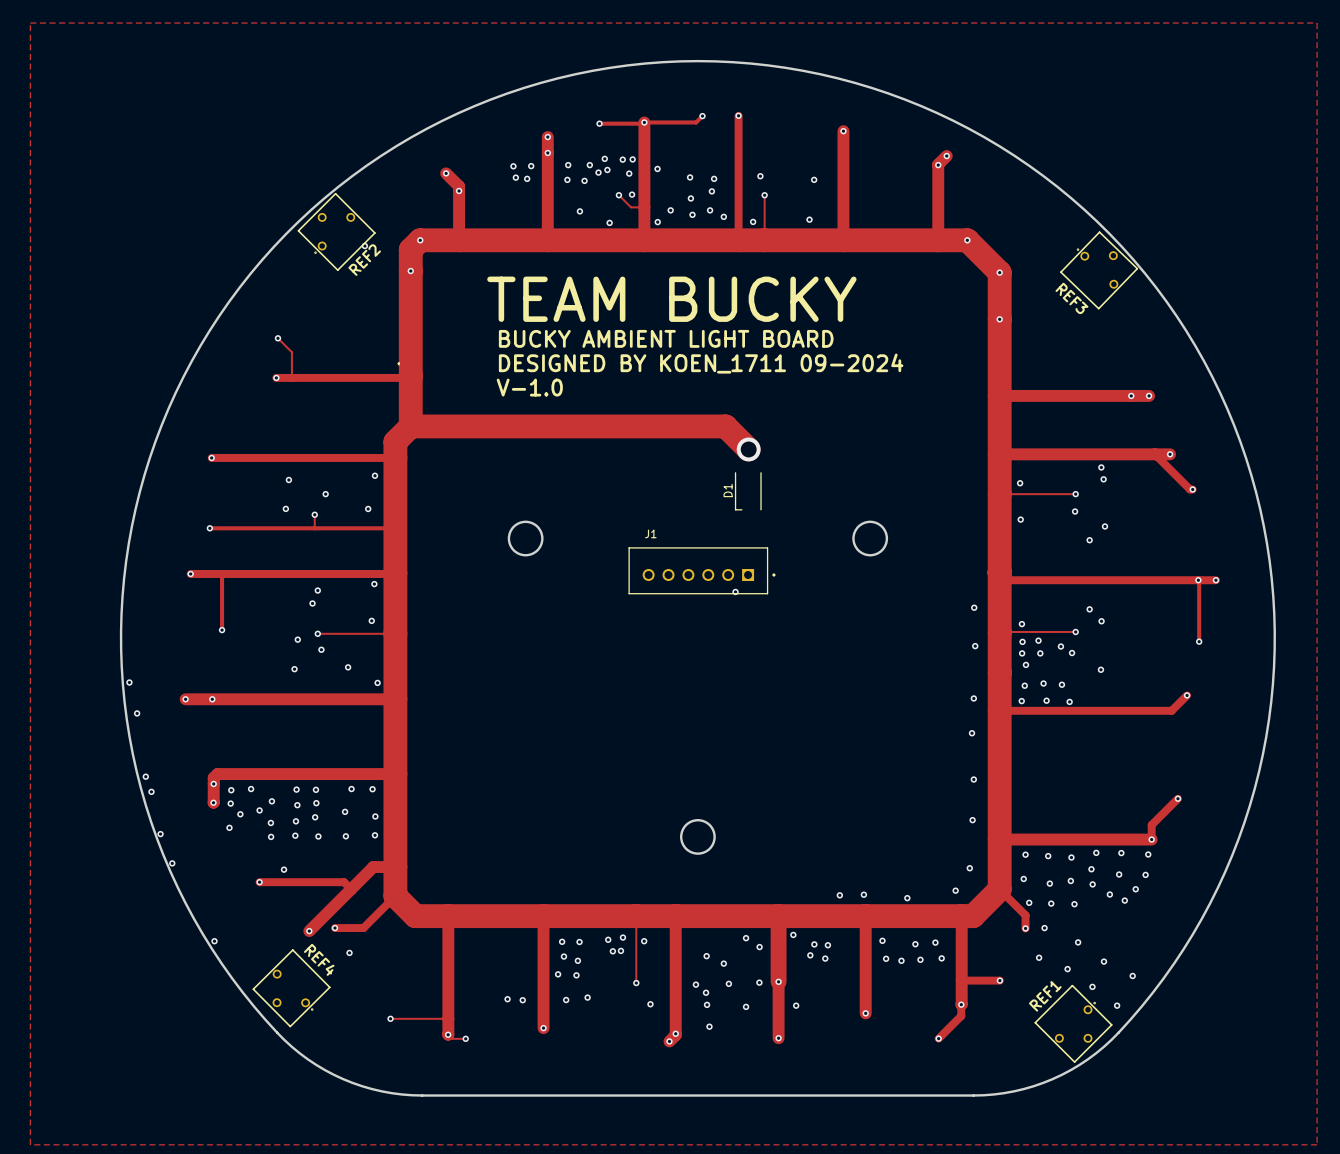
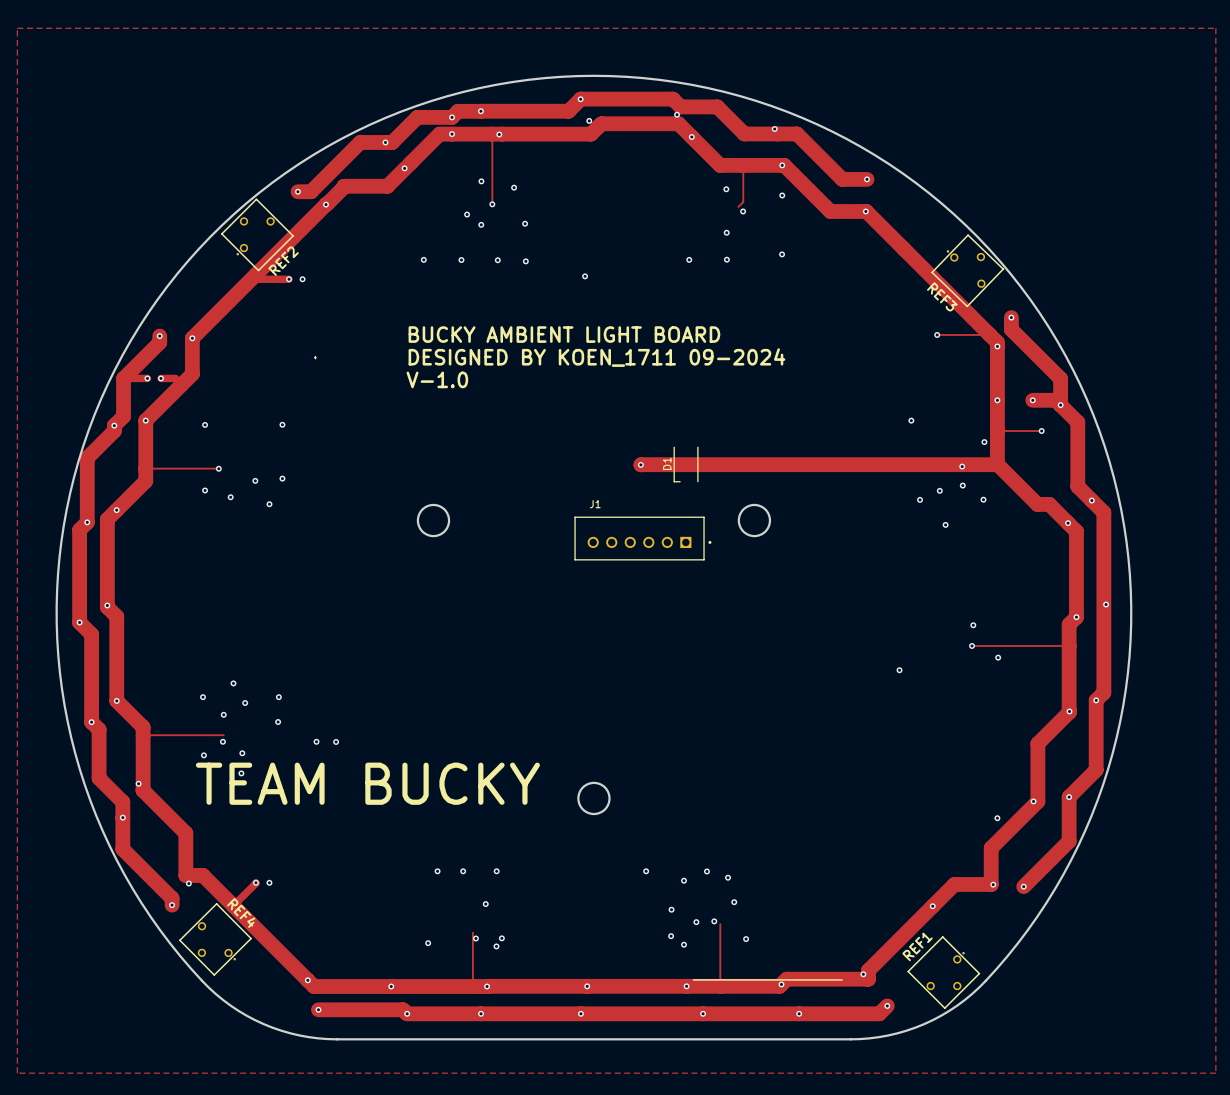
via: none -> (580, 99)
track: none -> (480, 111) (458, 111) (452, 117) (417, 117) (392, 142) (360, 142) (311, 191) (297, 191)
track: none -> (480, 111) (568, 111) (580, 99) (672, 99) (680, 106) (717, 106) (744, 133) (796, 133) (842, 179) (867, 179)
via: none -> (480, 111)
track: (738, 115) (738, 240) -> none
track: (702, 116) (696, 122) (644, 122) -> none
via: (702, 116) -> none
via: none -> (452, 117)
track: (644, 122) (644, 240) -> none
track: (644, 122) (599, 123) -> none
via: (599, 123) -> none
track: (843, 131) (843, 240) -> none
via: none -> (452, 134)
track: none -> (491, 134) (492, 204)
track: (547, 137) (547, 240) -> none
via: none -> (691, 137)
via: none -> (385, 142)
via: (547, 152) -> none
track: (946, 156) (938, 164) (938, 240) -> none
via: (946, 156) -> none
via: (604, 158) -> none
via: (622, 159) -> none
via: (632, 159) -> none
via: (568, 165) -> none
via: (589, 165) -> none
via: (938, 165) -> none
via: (513, 166) -> none
via: (531, 166) -> none
via: (657, 168) -> none
via: (607, 169) -> none
track: none -> (743, 165) (743, 202) (738, 206)
via: none -> (782, 165)
via: (598, 172) -> none
track: (446, 173) (459, 186) (459, 240) -> none
via: (629, 173) -> none
via: (760, 176) -> none
via: (515, 177) -> none
via: (690, 177) -> none
via: (527, 178) -> none
via: (714, 178) -> none
via: (567, 179) -> none
via: (814, 179) -> none
via: (584, 180) -> none
via: none -> (867, 179)
via: none -> (481, 181)
via: (459, 190) -> none
via: (711, 191) -> none
via: none -> (514, 187)
via: (632, 194) -> none
track: (618, 195) (631, 207) (644, 207) -> none
via: (618, 195) -> none
track: (764, 195) (764, 240) -> none
via: (764, 195) -> none
via: none -> (726, 189)
via: none -> (297, 191)
via: (690, 198) -> none
via: none -> (782, 195)
via: (670, 210) -> none
via: (710, 210) -> none
via: (579, 211) -> none
via: none -> (326, 204)
via: none -> (492, 204)
via: (692, 214) -> none
via: (723, 216) -> none
via: none -> (865, 211)
via: (753, 221) -> none
via: none -> (467, 214)
via: (609, 222) -> none
via: (657, 222) -> none
REF2 position: (336, 231) -> (257, 234)
via: none -> (525, 223)
via: none -> (481, 224)
via: (420, 240) -> none
via: (967, 240) -> none
via: none -> (726, 232)
via: (364, 246) -> none
via: none -> (782, 254)
REF3 position: (1099, 270) -> (967, 270)
via: (410, 271) -> none
via: none -> (423, 259)
via: none -> (461, 260)
via: none -> (689, 259)
via: none -> (726, 259)
via: none -> (497, 260)
via: (999, 272) -> none
via: none -> (525, 261)
track: none -> (255, 274) (260, 279) (289, 279)
via: none -> (585, 276)
via: none -> (289, 279)
via: none -> (302, 279)
text: TEAM BUCKY (671, 299) -> none
via position: (999, 319) -> (937, 334)
track: none -> (1011, 317) (1011, 329) (1060, 378) (1060, 405)
via: none -> (1011, 317)
track: (277, 337) (291, 352) (291, 377) -> none
via: (277, 338) -> none
text position: BUCKY AMBIENT LIGHT BOARD (666, 338) -> BUCKY AMBIENT LIGHT BOARD (564, 334)
track: none -> (989, 334) (937, 334)
track: none -> (159, 336) (159, 342) (123, 378)
via: none -> (159, 336)
via: none -> (192, 338)
line: (399, 363) (399, 364) -> none
line: (399, 363) (398, 363) -> none
text position: DESIGNED BY KOEN_1711 09-2024 (701, 363) -> DESIGNED BY KOEN_1711 09-2024 (596, 357)
via: none -> (997, 346)
track: (410, 375) (408, 377) (276, 377) -> none
line: none -> (314, 357) (315, 358)
via: (276, 377) -> none
text position: V-1.0 (529, 387) -> V-1.0 (437, 379)
track: (999, 395) (1149, 395) -> none
via: (1131, 395) -> none
via: (1149, 395) -> none
track: none -> (147, 378) (123, 378)
via: none -> (147, 378)
track: none -> (161, 378) (175, 378) (181, 384)
via: none -> (161, 378)
track: none -> (123, 378) (123, 416) (114, 425) (114, 431) (87, 458) (87, 522) (79, 530) (79, 622) (91, 634) (91, 722) (99, 729) (99, 778) (122, 802) (122, 849) (172, 898) (172, 905)
via: none -> (997, 400)
track: none -> (1032, 400) (1055, 400) (1077, 422) (1077, 486) (1103, 512) (1103, 692) (1096, 700) (1096, 770) (1069, 797) (1069, 841) (1023, 886)
via: none -> (1032, 400)
track: (410, 426) (395, 441) (395, 896) -> none
track: (410, 426) (725, 426) (748, 449) -> none
track: (410, 426) (410, 249) (420, 240) (967, 240) (999, 272) (999, 572) -> none
via: none -> (1060, 405)
via: none -> (145, 420)
via: none -> (911, 420)
via: none -> (282, 424)
via: none -> (114, 425)
via: (748, 449) -> none
track: (999, 454) (1170, 454) -> none
track: (1154, 454) (1190, 489) (1192, 489) -> none
via: (1170, 454) -> none
track: none -> (1041, 431) (997, 431) (997, 464) (640, 464)
via: none -> (1041, 431)
via position: (211, 457) -> (205, 424)
track: (395, 457) (211, 457) -> none
via: none -> (984, 442)
via: (1101, 467) -> none
via: (374, 475) -> none
via: (1103, 479) -> none
via: (288, 480) -> none
via: (1020, 483) -> none
via: (1192, 489) -> none
via: none -> (640, 464)
via: none -> (962, 466)
via: (325, 494) -> none
via: (1075, 494) -> none
track: none -> (145, 468) (218, 468)
via: none -> (218, 468)
via: none -> (282, 478)
via: (368, 508) -> none
via: (1075, 511) -> none
via: none -> (962, 485)
track: (314, 514) (314, 528) -> none
via: (314, 514) -> none
via: none -> (230, 497)
via: (1105, 526) -> none
track: (209, 528) (395, 528) -> none
via position: (209, 528) -> (205, 490)
via: none -> (920, 499)
via: none -> (983, 499)
via: none -> (1091, 500)
via: none -> (269, 504)
round board edge position: (525, 538) -> (433, 520)
round board edge position: (870, 538) -> (754, 520)
via: none -> (116, 510)
via: (1089, 540) -> none
via: none -> (87, 522)
via: none -> (1068, 523)
via: none -> (945, 524)
track: (999, 572) (999, 889) -> none
track: (999, 572) (1007, 580) (1215, 580) -> none
via: (190, 573) -> none
track: (222, 573) (222, 629) -> none
track: (395, 573) (190, 573) -> none
via: (1198, 580) -> none
via: (1215, 580) -> none
via: (374, 584) -> none
via: (317, 590) -> none
via: (735, 591) -> none
via: (312, 603) -> none
via: (974, 607) -> none
via: (1089, 609) -> none
via: (371, 620) -> none
via: (1101, 621) -> none
via: (1021, 624) -> none
via: (222, 630) -> none
track: (1075, 631) (999, 632) -> none
via: (1075, 631) -> none
via: (317, 633) -> none
track: (395, 633) (317, 633) -> none
via: (297, 639) -> none
via: (1038, 640) -> none
via: (1022, 641) -> none
via: none -> (107, 605)
via: (975, 646) -> none
via: (1060, 646) -> none
via: (321, 649) -> none
via: (1022, 653) -> none
via: (1040, 653) -> none
via: (1072, 653) -> none
via: none -> (1076, 617)
via: none -> (79, 622)
via: none -> (973, 625)
via: (1025, 664) -> none
via: (348, 667) -> none
via: (294, 669) -> none
via: (1100, 669) -> none
via: (129, 682) -> none
via: (377, 682) -> none
via: (1043, 683) -> none
via: (1061, 684) -> none
via: (1024, 685) -> none
track: none -> (972, 645) (1069, 646)
via: none -> (972, 645)
track: (1187, 695) (1171, 710) (999, 710) -> none
via: (1187, 695) -> none
via: (973, 698) -> none
via: none -> (998, 657)
track: (185, 699) (395, 699) -> none
via: (185, 699) -> none
via: (212, 699) -> none
via: (1046, 700) -> none
via: (1021, 701) -> none
via: (1069, 701) -> none
via: none -> (899, 670)
via: (137, 713) -> none
via: none -> (233, 683)
via: (972, 733) -> none
via: none -> (202, 697)
via: none -> (278, 697)
via: none -> (1096, 700)
via: none -> (116, 700)
via: none -> (245, 703)
via: none -> (1069, 711)
via: none -> (223, 714)
via: none -> (91, 722)
via: none -> (278, 722)
track: (395, 774) (217, 774) (213, 777) (213, 802) -> none
via: (145, 776) -> none
via: (973, 779) -> none
track: none -> (223, 735) (143, 735)
via: (213, 783) -> none
via: (296, 789) -> none
via: (315, 789) -> none
via: (231, 790) -> none
via: (151, 791) -> none
track: (1177, 798) (1151, 824) (1151, 839) (999, 839) -> none
via: (1177, 798) -> none
via: (213, 802) -> none
via: (316, 803) -> none
via: (297, 805) -> none
via: (259, 810) -> none
via: (345, 811) -> none
via: (240, 814) -> none
via: (375, 816) -> none
via: (315, 817) -> none
via: (972, 820) -> none
via: (295, 821) -> none
via: (229, 827) -> none
text: none -> TEAM BUCKY (367, 783)
via: (295, 835) -> none
via: (374, 835) -> none
via: (271, 836) -> none
via: (318, 836) -> none
via: (345, 836) -> none
round board edge position: (697, 836) -> (593, 798)
via: (1151, 839) -> none
track: none -> (143, 790) (143, 727) (116, 700) (116, 616) (107, 607) (107, 519) (145, 481) (145, 420) (192, 374) (192, 338) (343, 186) (387, 186) (439, 134) (591, 134) (601, 123) (678, 123) (720, 165) (784, 165) (830, 211) (866, 211) (997, 342) (997, 464) (1037, 504) (1049, 504) (1076, 531) (1076, 617) (1069, 624) (1069, 712) (1037, 743) (1037, 801) (991, 848) (991, 884) (954, 884) (868, 970) (868, 979) (786, 979) (779, 986) (314, 986) (202, 875) (185, 875) (185, 833) (143, 790)
via: none -> (1069, 797)
via: (1096, 852) -> none
via: (1025, 854) -> none
via: (1148, 854) -> none
via: (1048, 856) -> none
via: (1071, 857) -> none
via position: (172, 863) -> (122, 817)
track: (395, 867) (373, 867) (309, 931) -> none
via: (969, 868) -> none
via: (284, 869) -> none
via: (1091, 869) -> none
via: none -> (997, 818)
via: (1119, 874) -> none
via: (1145, 874) -> none
via: (1023, 878) -> none
via: (1070, 880) -> none
track: (259, 882) (344, 882) (351, 889) -> none
via: (259, 882) -> none
via: (1049, 883) -> none
via: (1092, 884) -> none
track: (999, 889) (973, 916) (415, 916) (395, 896) -> none
track: (999, 889) (1025, 915) (1025, 928) -> none
via: (1135, 889) -> none
via: (955, 890) -> none
via: (863, 894) -> none
via: (1109, 894) -> none
via: (839, 895) -> none
track: (395, 896) (363, 928) (335, 928) -> none
via: (907, 898) -> none
via: (1124, 900) -> none
via: (1029, 902) -> none
via: (1051, 903) -> none
via: (1074, 904) -> none
track: (448, 916) (448, 1034) (452, 1038) (465, 1038) -> none
track: (543, 916) (543, 1028) -> none
track: (636, 916) (636, 983) -> none
track: (675, 916) (675, 1035) (669, 1041) -> none
track: (778, 916) (778, 1038) -> none
track: (865, 916) (865, 1013) -> none
track: (961, 916) (961, 1015) (938, 1038) -> none
via: (335, 928) -> none
via: none -> (437, 871)
via: none -> (463, 871)
via: none -> (496, 871)
via: none -> (646, 871)
via: none -> (706, 871)
via: (1025, 928) -> none
via: (1044, 928) -> none
via: (309, 931) -> none
via: (622, 937) -> none
via: (608, 939) -> none
track: none -> (255, 882) (233, 905)
via: none -> (255, 882)
via: none -> (269, 882)
via: (882, 940) -> none
via: (562, 941) -> none
via: (644, 941) -> none
via: (579, 942) -> none
via: (935, 942) -> none
via: (814, 944) -> none
via: (915, 944) -> none
via: (827, 945) -> none
via: (759, 947) -> none
via: (620, 950) -> none
via: (612, 951) -> none
via: (349, 952) -> none
via: (810, 955) -> none
via: (563, 956) -> none
via: (706, 956) -> none
via: (1039, 957) -> none
via: (825, 958) -> none
via: (886, 958) -> none
via: (941, 958) -> none
via: (920, 959) -> none
via: (577, 960) -> none
via: (901, 960) -> none
via: none -> (734, 902)
via position: (1103, 961) -> (1023, 886)
via: none -> (485, 904)
via: (723, 963) -> none
via: none -> (172, 905)
via: none -> (932, 906)
via: none -> (671, 909)
via: (1067, 969) -> none
via: (558, 974) -> none
via: (576, 975) -> none
via: (1132, 975) -> none
track: (961, 980) (999, 980) -> none
via: (999, 980) -> none
via: (636, 983) -> none
via: (728, 983) -> none
via: (695, 984) -> none
track: none -> (720, 924) (720, 986)
via: (1092, 986) -> none
REF4 position: (291, 988) -> (215, 939)
via: (706, 992) -> none
track: none -> (472, 932) (473, 986)
via: (587, 997) -> none
via: none -> (671, 936)
via: (507, 999) -> none
via: none -> (501, 938)
via: (566, 1000) -> none
via: (650, 1004) -> none
via: (707, 1004) -> none
via: (961, 1004) -> none
via: none -> (428, 943)
via position: (796, 1005) -> (746, 939)
via: (1117, 1005) -> none
via: none -> (496, 946)
via: (865, 1013) -> none
track: (390, 1018) (448, 1018) -> none
via: (390, 1018) -> none
REF1 position: (1073, 1023) -> (943, 972)
via: (709, 1026) -> none
via: (543, 1028) -> none
board edge: (277, 1032) (307, 1059) (343, 1079) (381, 1091) (422, 1095) (993, 1094) (1033, 1086) (1061, 1074) (1087, 1059) (1111, 1039) (1153, 992) (1183, 949) (1210, 903) (1232, 855) (1249, 805) (1262, 754) (1271, 702) (1274, 649) (1273, 596) (1267, 543) (1251, 475) (1234, 425) (1212, 376) (1186, 330) (1155, 287) (1121, 246) (1084, 209) (1029, 165) (984, 137) (937, 113) (888, 93) (837, 78) (785, 67) (733, 62) (680, 61) (627, 65) (575, 74) (507, 93) (442, 120) (396, 146) (352, 176) (311, 209) (273, 246) (229, 301) (200, 345) (175, 392) (149, 458) (135, 509) (126, 561) (121, 613) (122, 684) (129, 736) (141, 788) (157, 839) (177, 887) (202, 934) (242, 992) (277, 1032) -> (202, 980) (230, 1005) (263, 1024) (299, 1035) (337, 1039) (869, 1038) (897, 1033) (924, 1024) (949, 1010) (979, 987) (1017, 943) (1046, 903) (1070, 860) (1091, 815) (1108, 769) (1120, 721) (1127, 672) (1131, 623) (1129, 574) (1124, 525) (1113, 477) (1099, 430) (1080, 384) (1057, 341) (1030, 299) (988, 248) (953, 214) (915, 182) (875, 155) (831, 131) (771, 105) (724, 91) (675, 82) (626, 76) (577, 76) (528, 79) (463, 91) (416, 105) (370, 124) (327, 146) (272, 182) (234, 214) (188, 261) (157, 299) (130, 341) (107, 384) (88, 430) (70, 493) (61, 541) (57, 590) (57, 640) (62, 689) (75, 753) (90, 800) (109, 845) (141, 903) (170, 943) (202, 980)
via: (675, 1033) -> none
via: (448, 1034) -> none
via: (465, 1038) -> none
via: (778, 1038) -> none
via: (669, 1041) -> none
line: none -> (693, 979) (842, 979)
via: none -> (307, 980)
via: none -> (781, 984)
via: none -> (391, 986)
via: none -> (487, 986)
via: none -> (587, 986)
via: none -> (686, 986)
track: none -> (887, 1005) (879, 1013) (407, 1013) (403, 1009) (318, 1009)
via: none -> (887, 1005)
via: none -> (318, 1009)
via: none -> (407, 1013)
via: none -> (481, 1013)
via: none -> (580, 1013)
via: none -> (703, 1013)
via: none -> (799, 1013)

